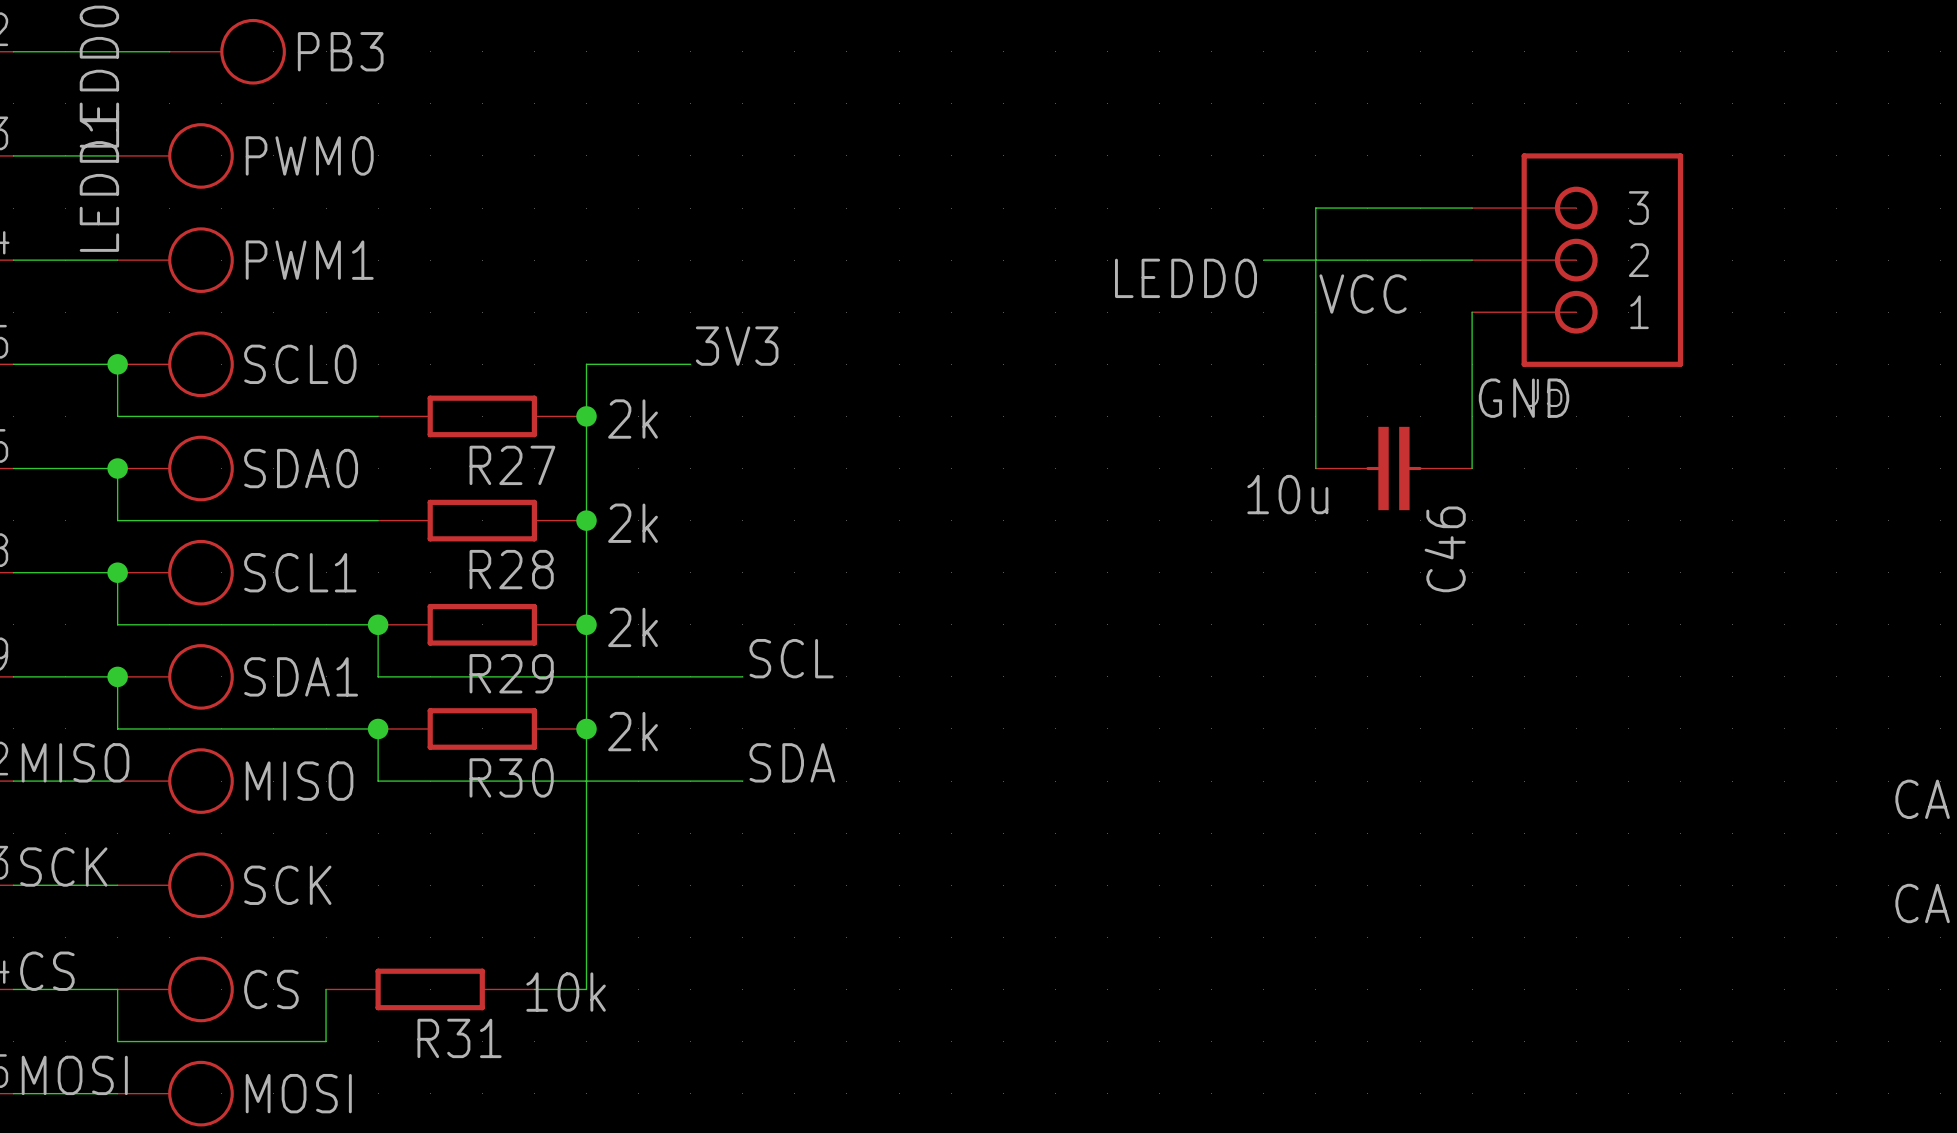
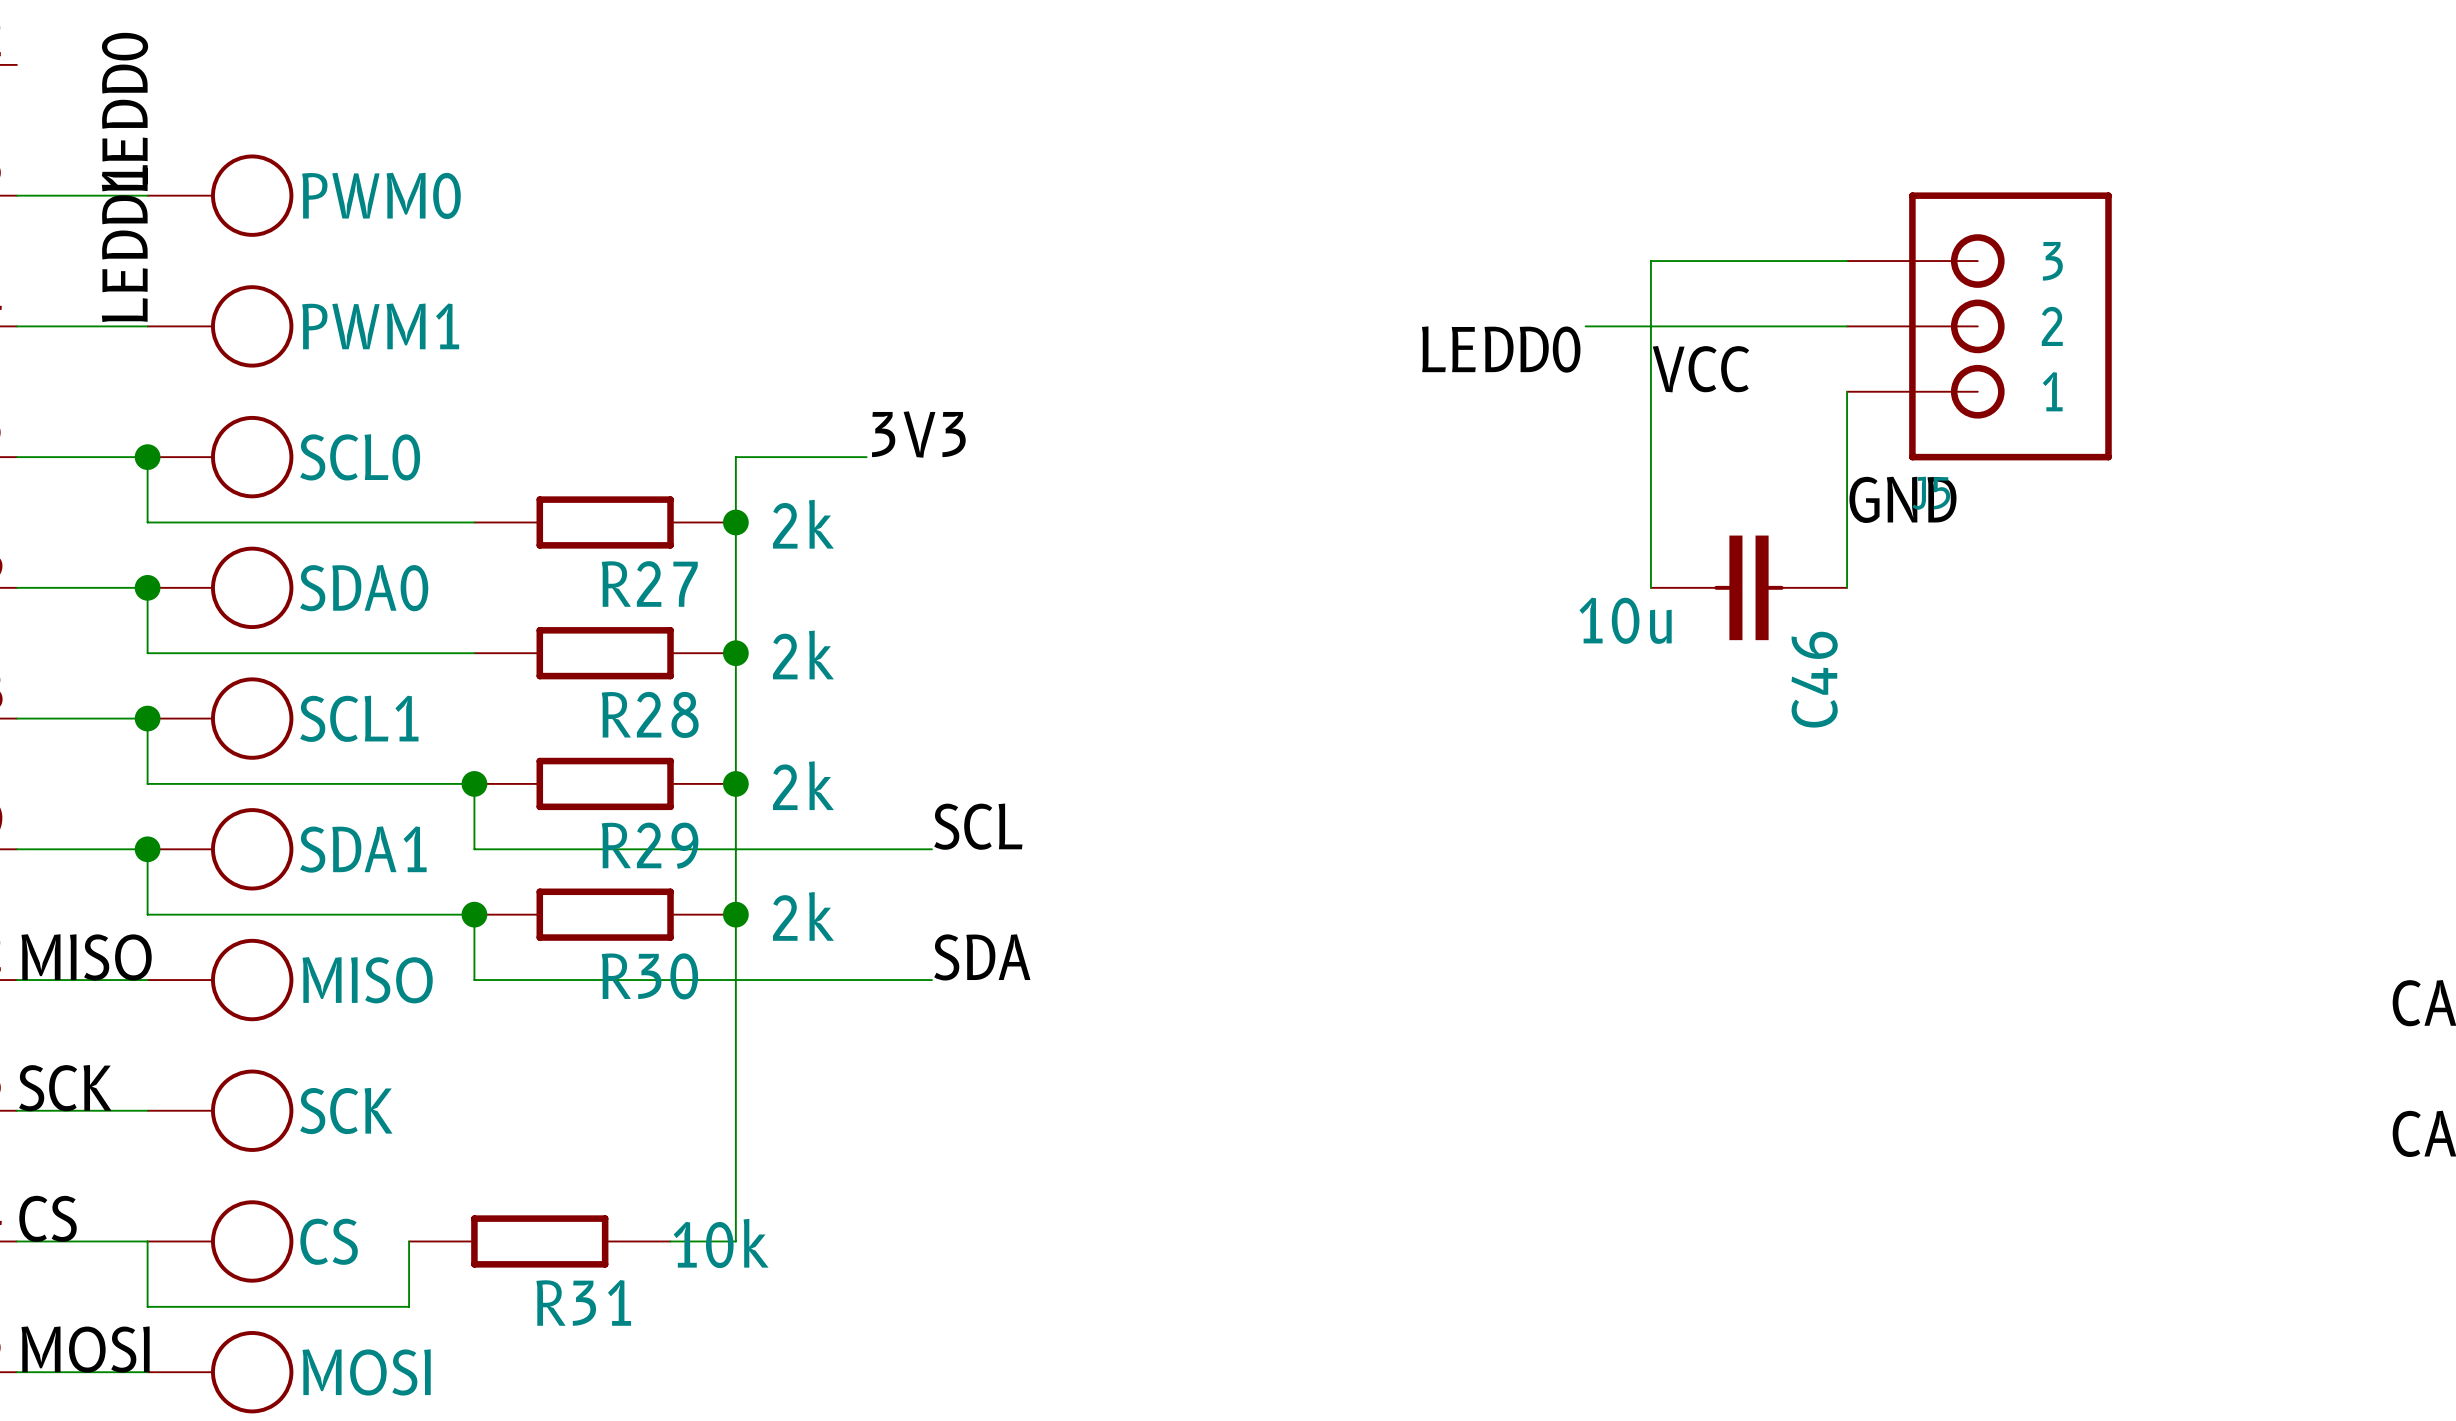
wire: (13, 51) (169, 51) -> none
PB3: (227, 51) -> none

